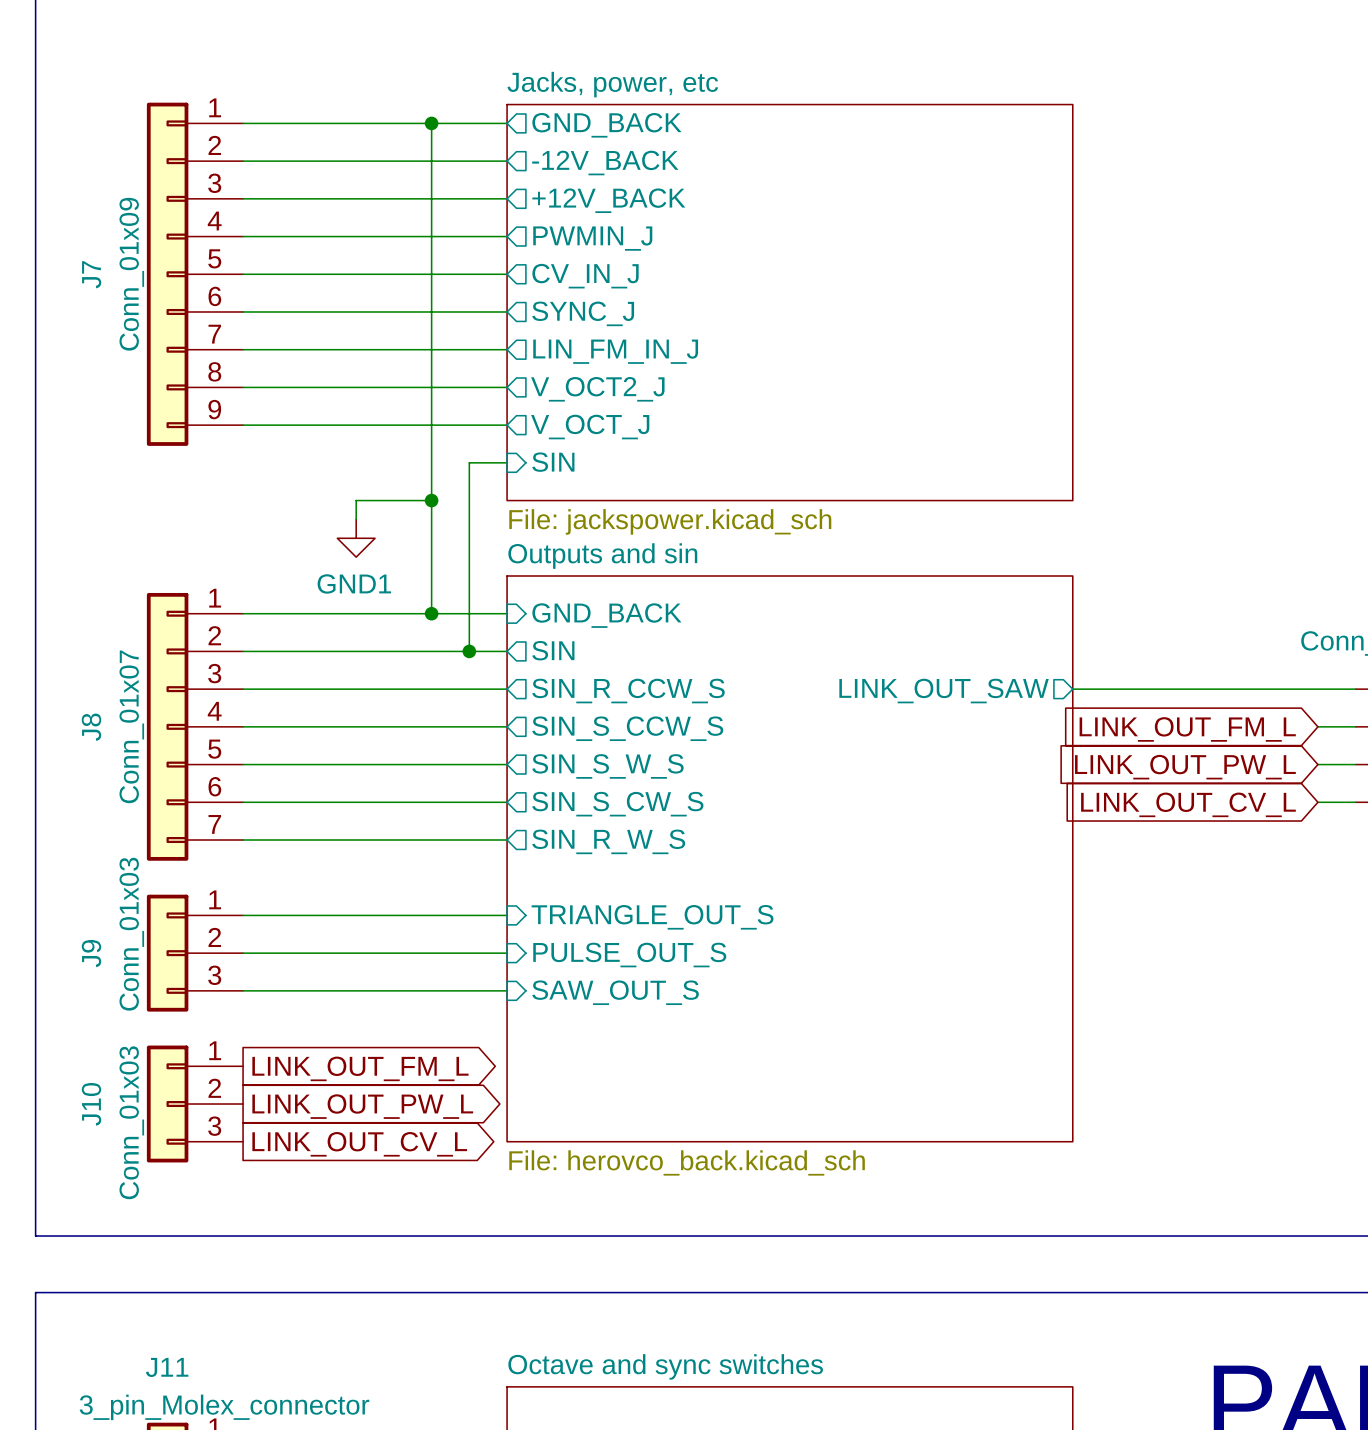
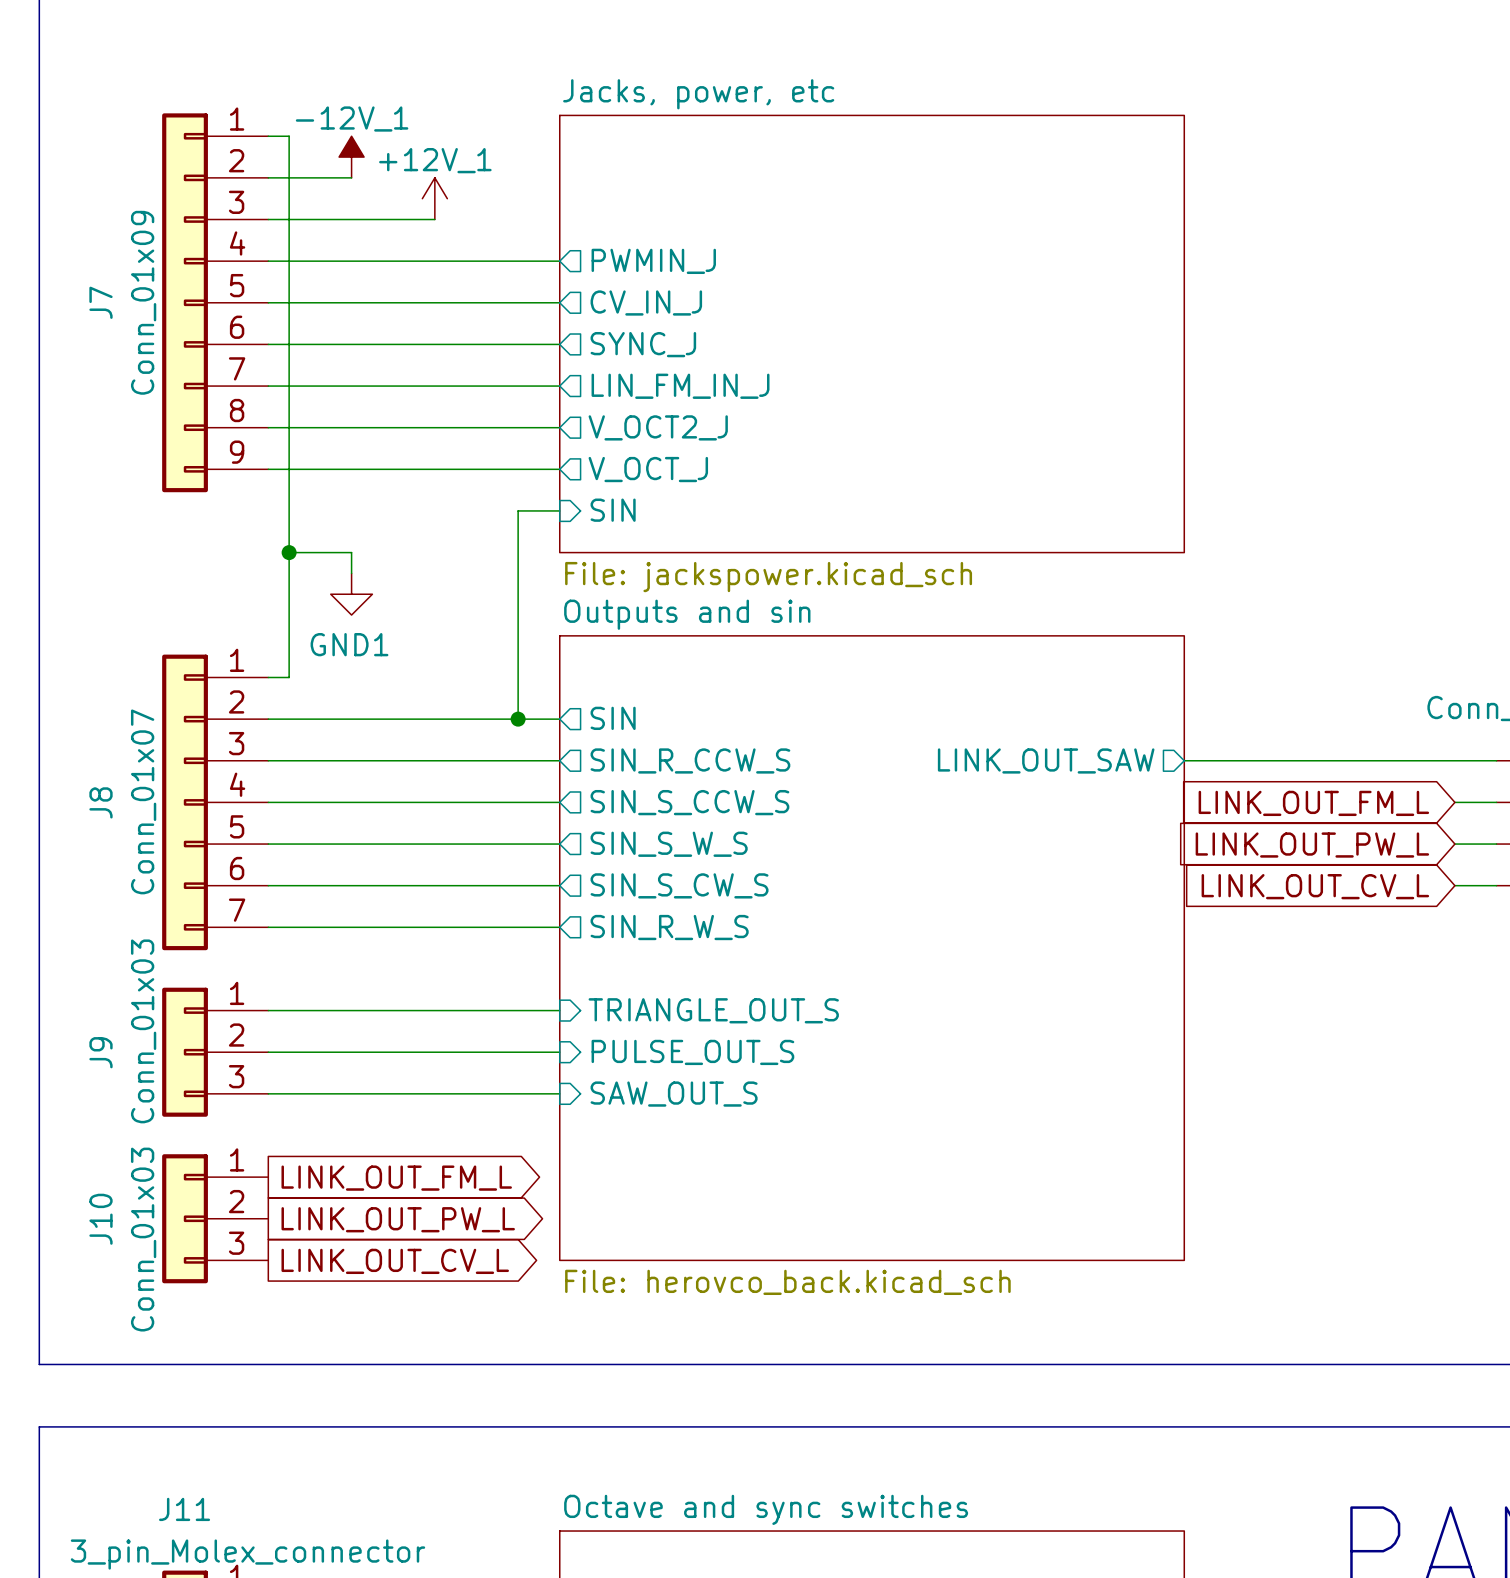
wire: (261, 123) (507, 123) -> (289, 136) (289, 677)
wire: (431, 123) (431, 613) -> none
junction: (431, 123) -> none
sheet pin: GND_BACK (606, 125) -> none
power symbol: none -> -12V_1 (351, 157)
wire: (318, 161) (507, 161) -> none
sheet pin: -12V_BACK (605, 163) -> none
power symbol: none -> +12V_1 (434, 198)
wire: (393, 198) (507, 198) -> none
sheet pin: +12V_BACK (608, 200) -> none
wire: none -> (289, 552) (351, 552) (351, 573)
junction: none -> (289, 552)
wire: (431, 500) (356, 500) (356, 519) -> none
junction: (431, 500) -> none
power symbol position: GND1 (356, 538) -> GND1 (351, 594)
wire: (261, 613) (507, 613) -> none
junction: (431, 613) -> none
sheet pin: GND_BACK (606, 615) -> none

